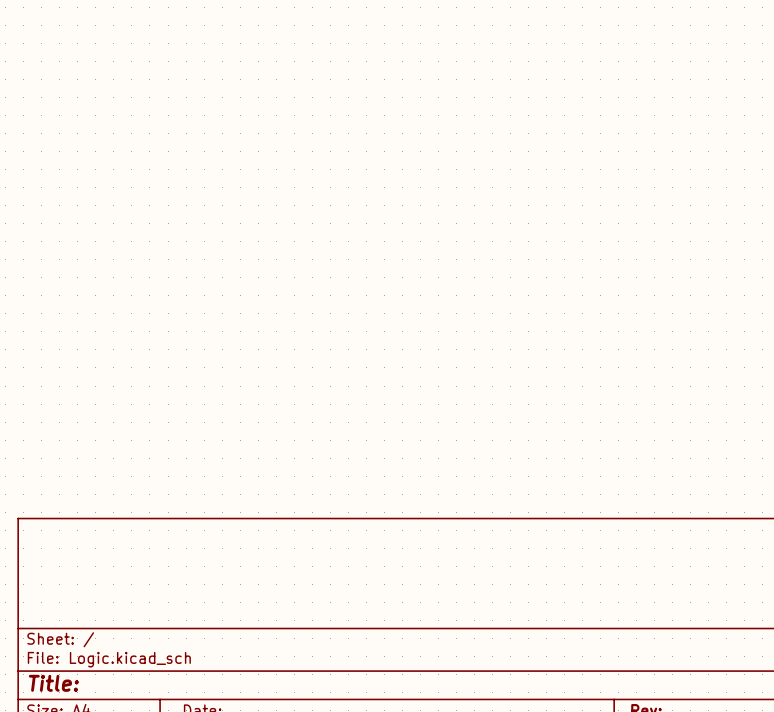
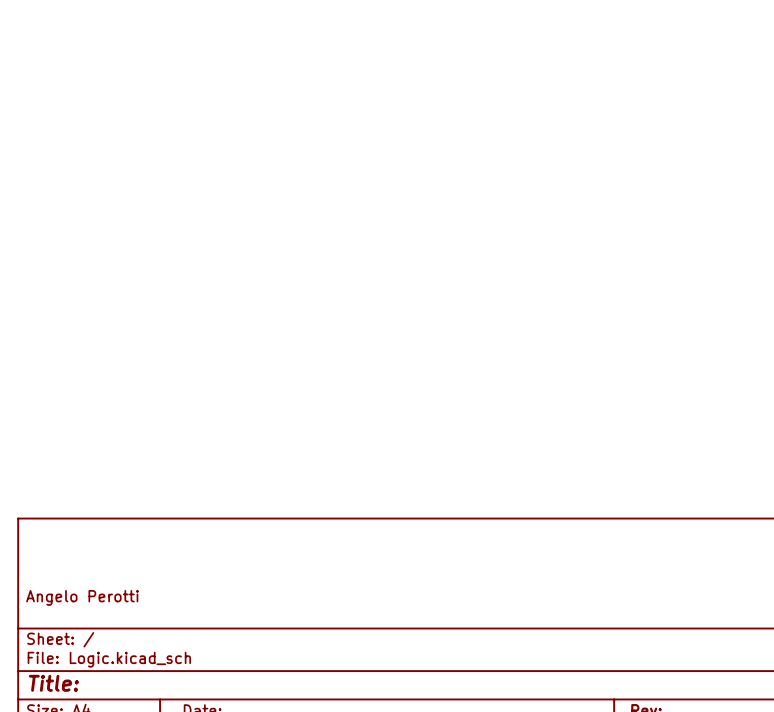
title block: none -> Angelo Perotti (82, 597)

